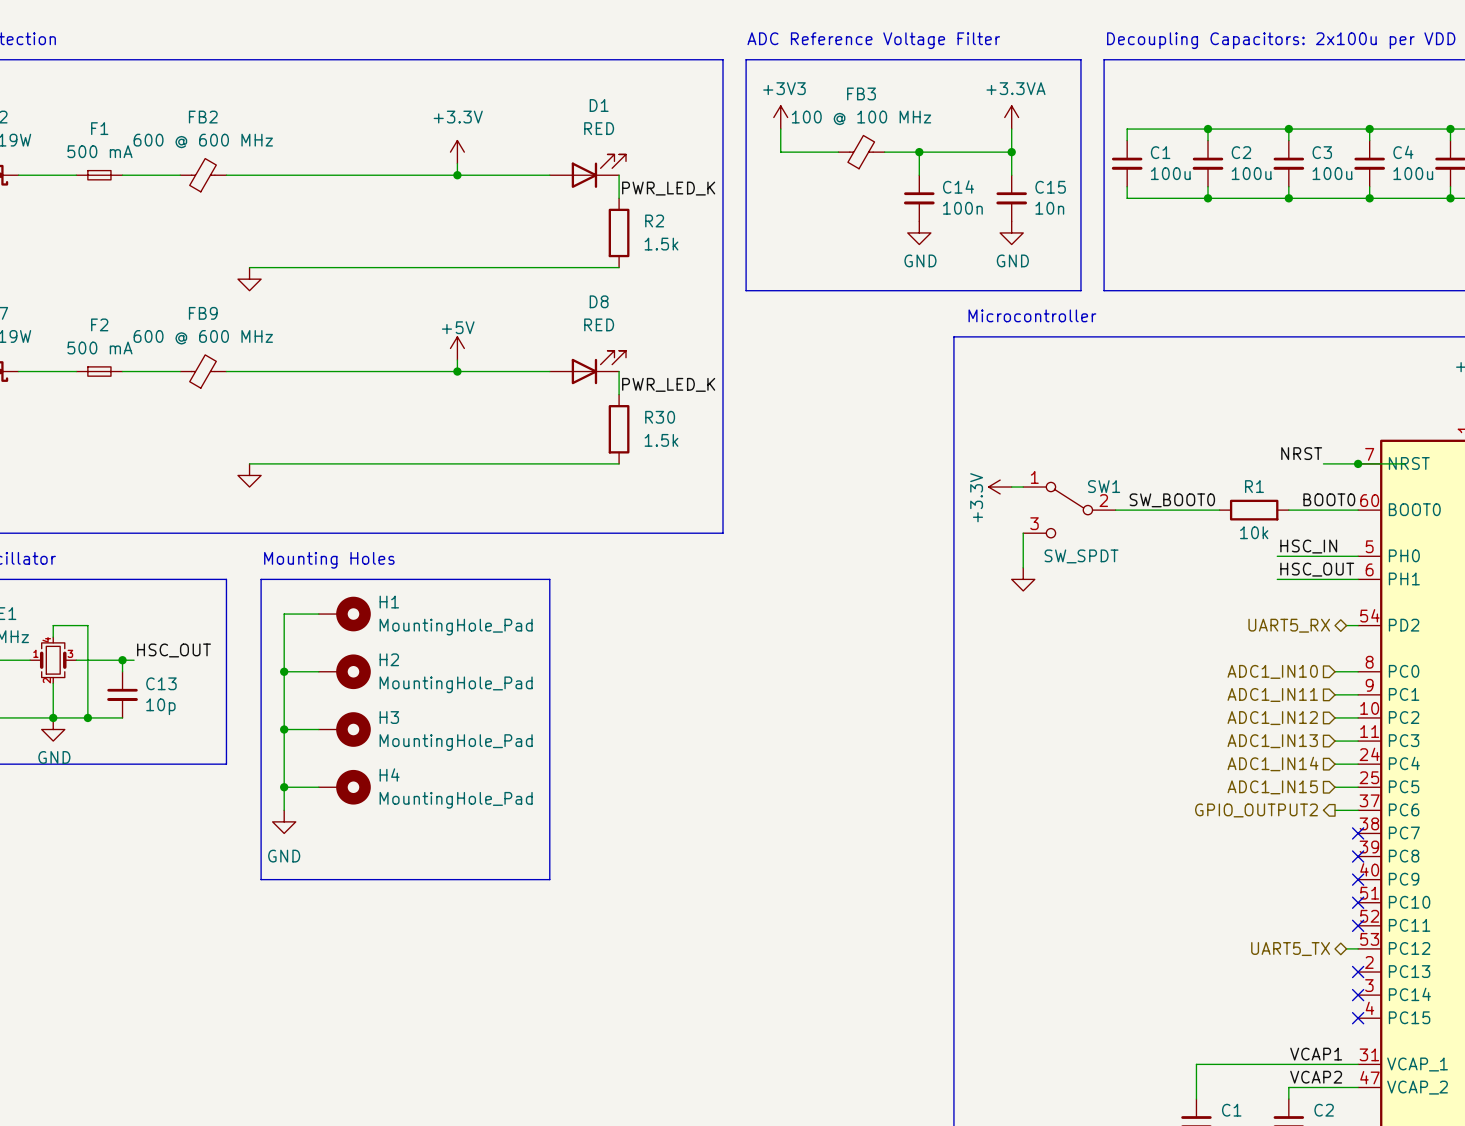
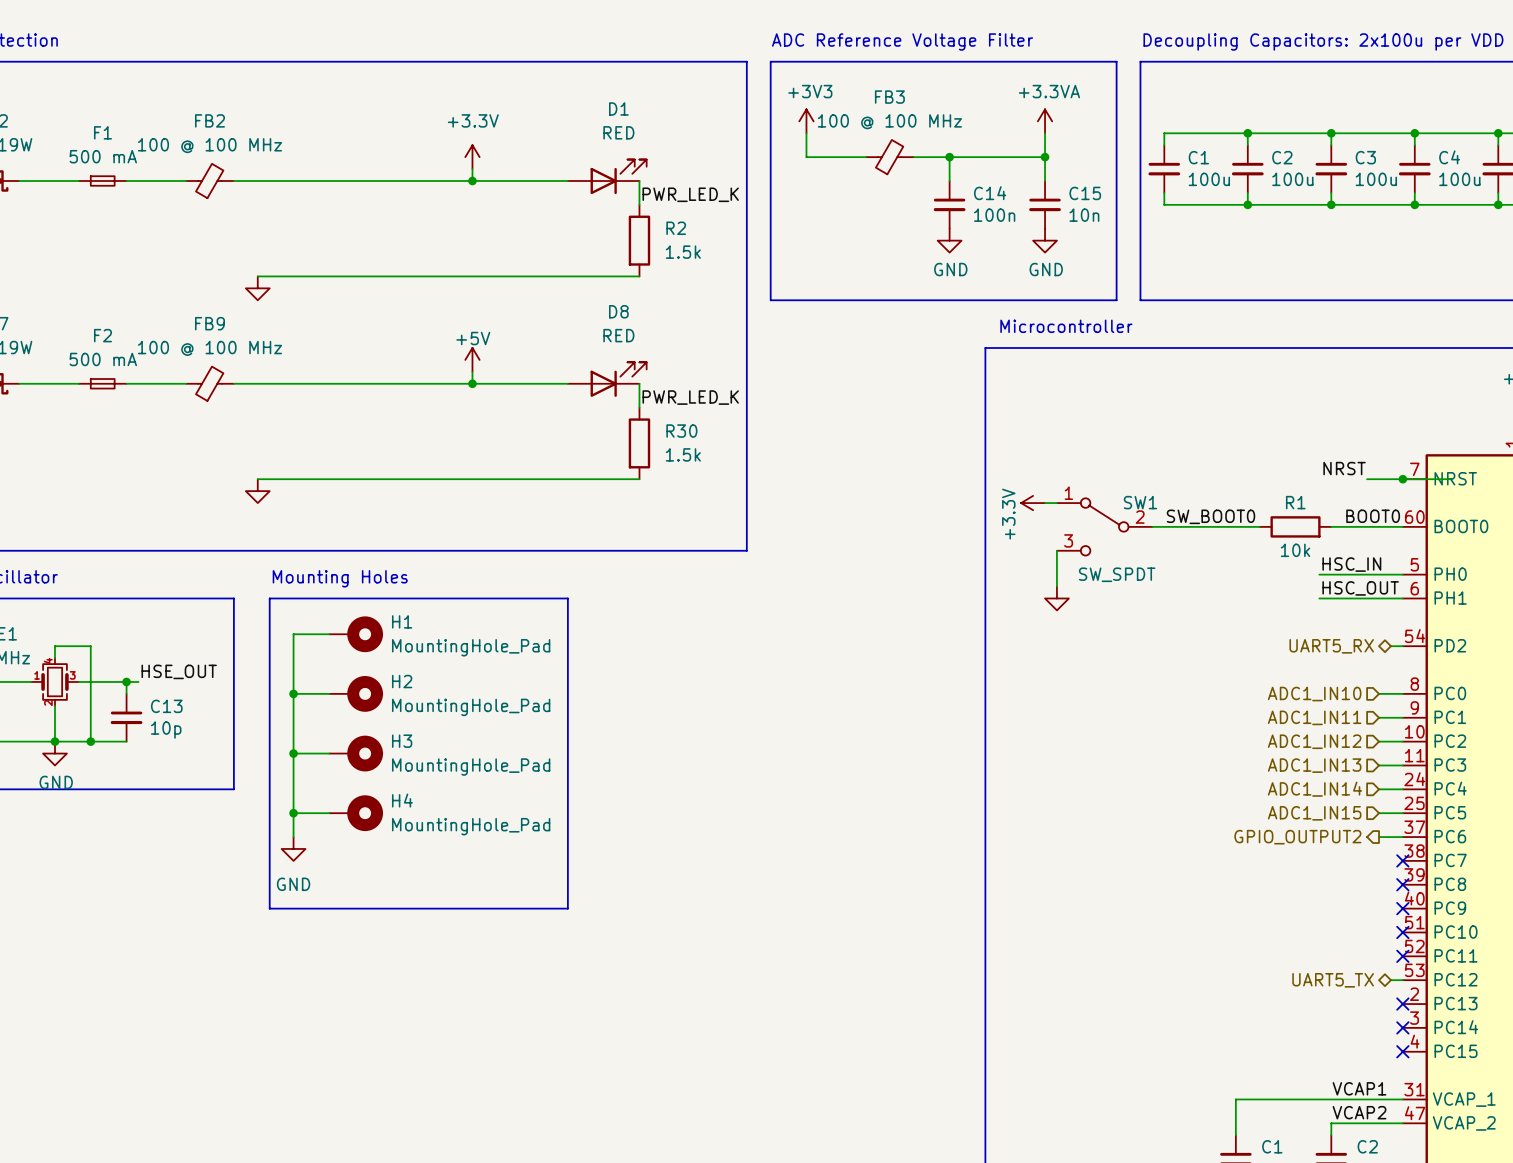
FB2 value: 600 @ 600 MHz (203, 140) -> 100 @ 100 MHz (209, 145)
FB9 value: 600 @ 600 MHz (203, 337) -> 100 @ 100 MHz (209, 348)
label: HSC_OUT (174, 650) -> HSE_OUT (179, 671)

